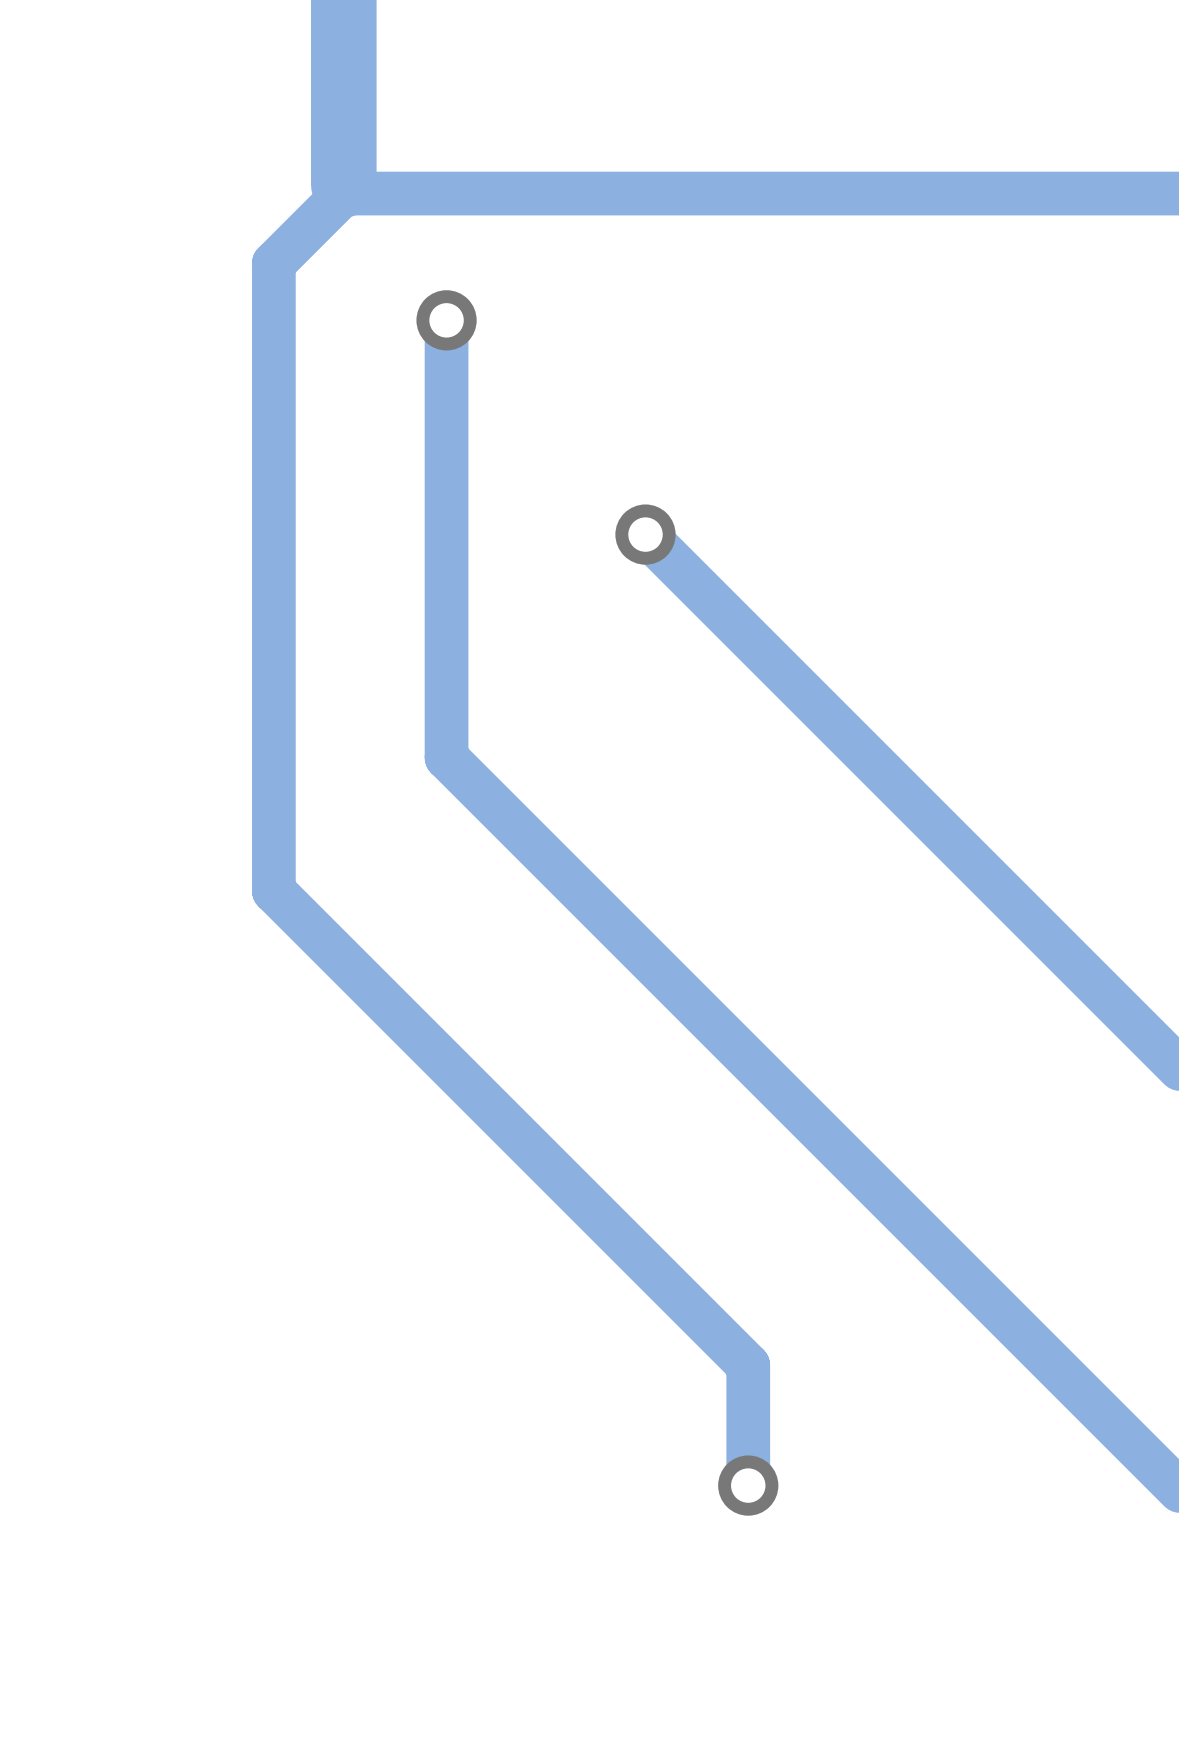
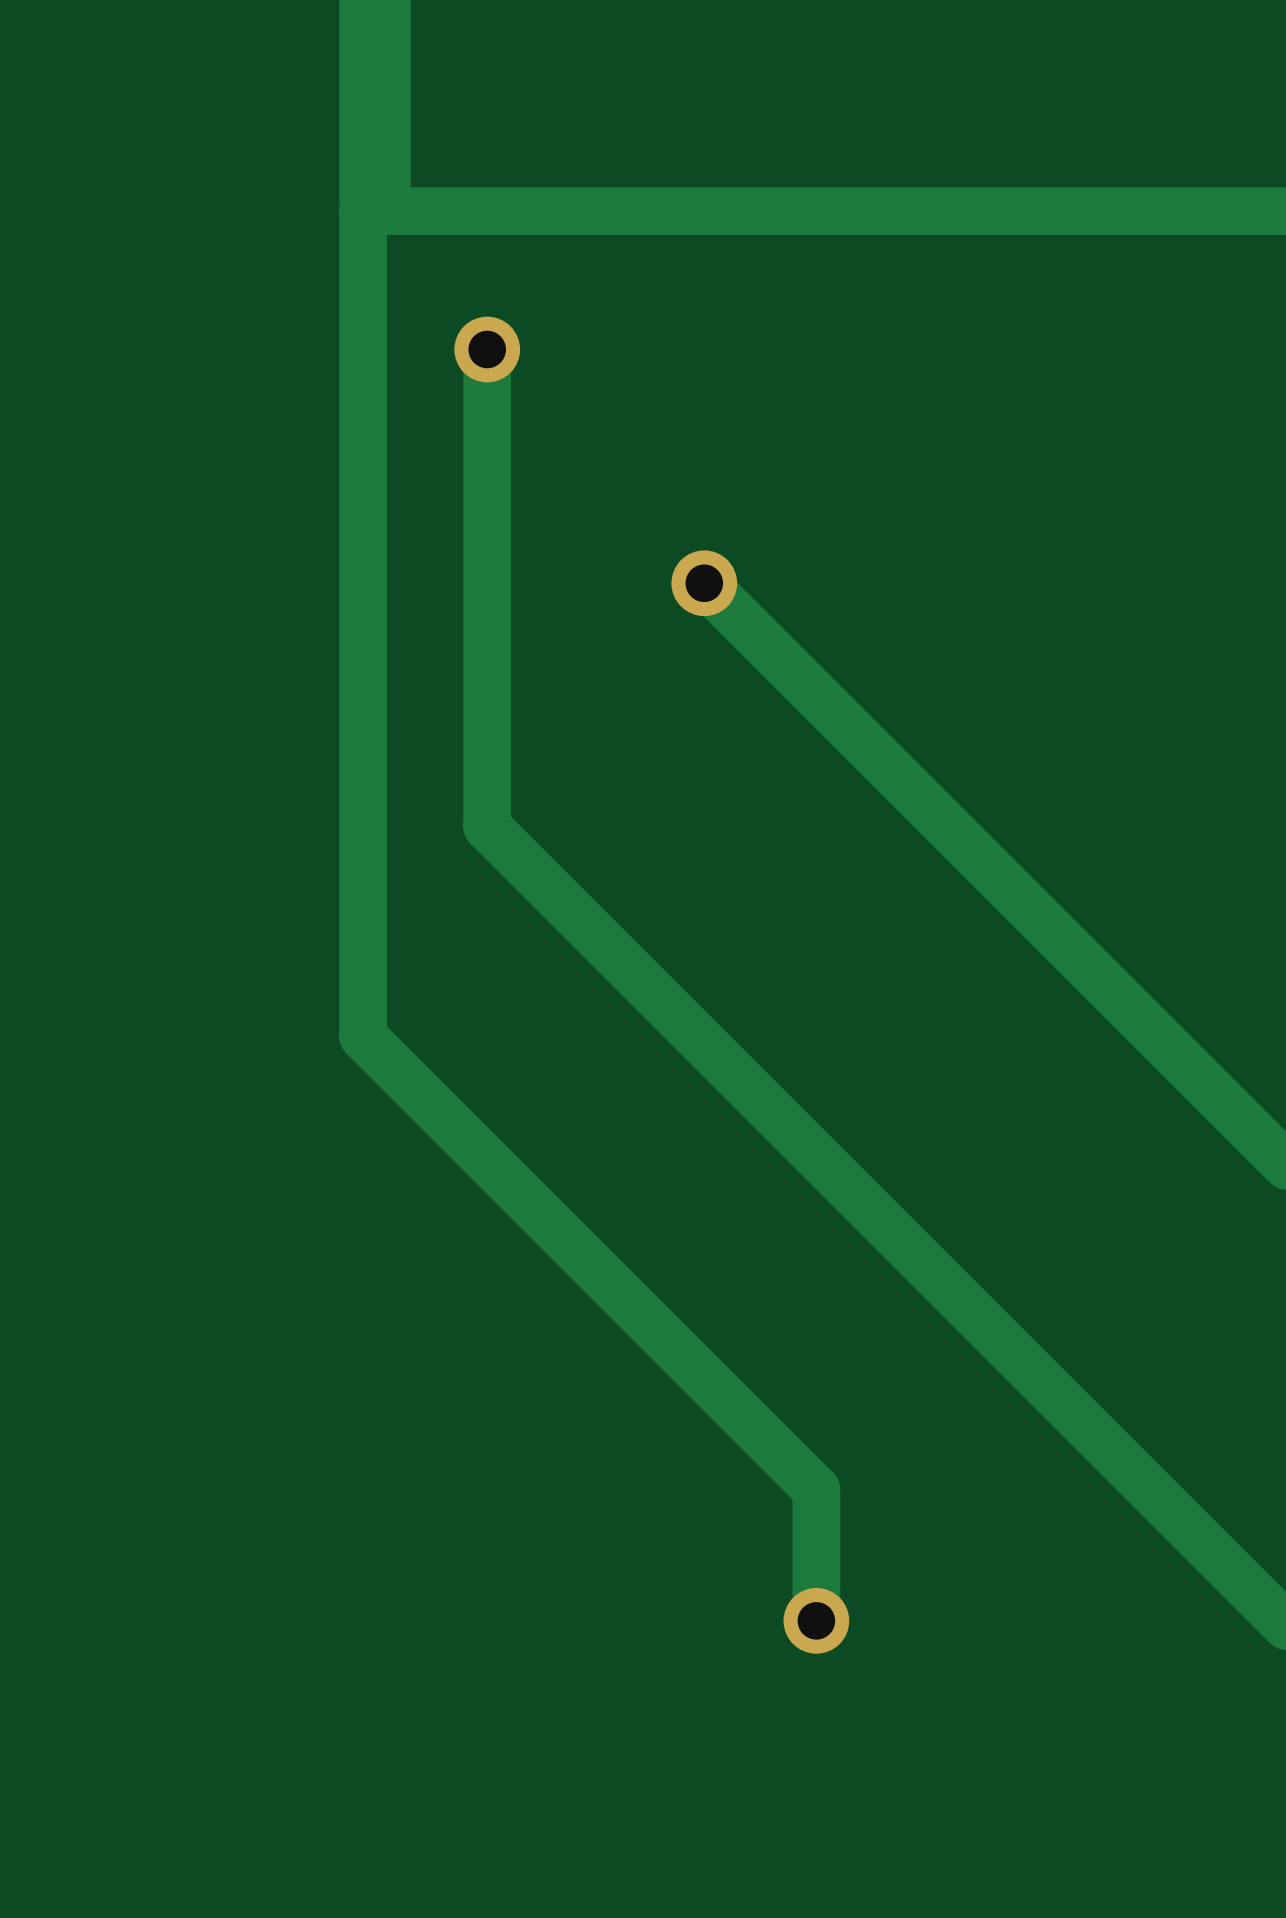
track: (341, 193) (341, 195) (273, 263) (273, 890) (332, 949) -> (372, 211) (363, 211) (363, 1036)

